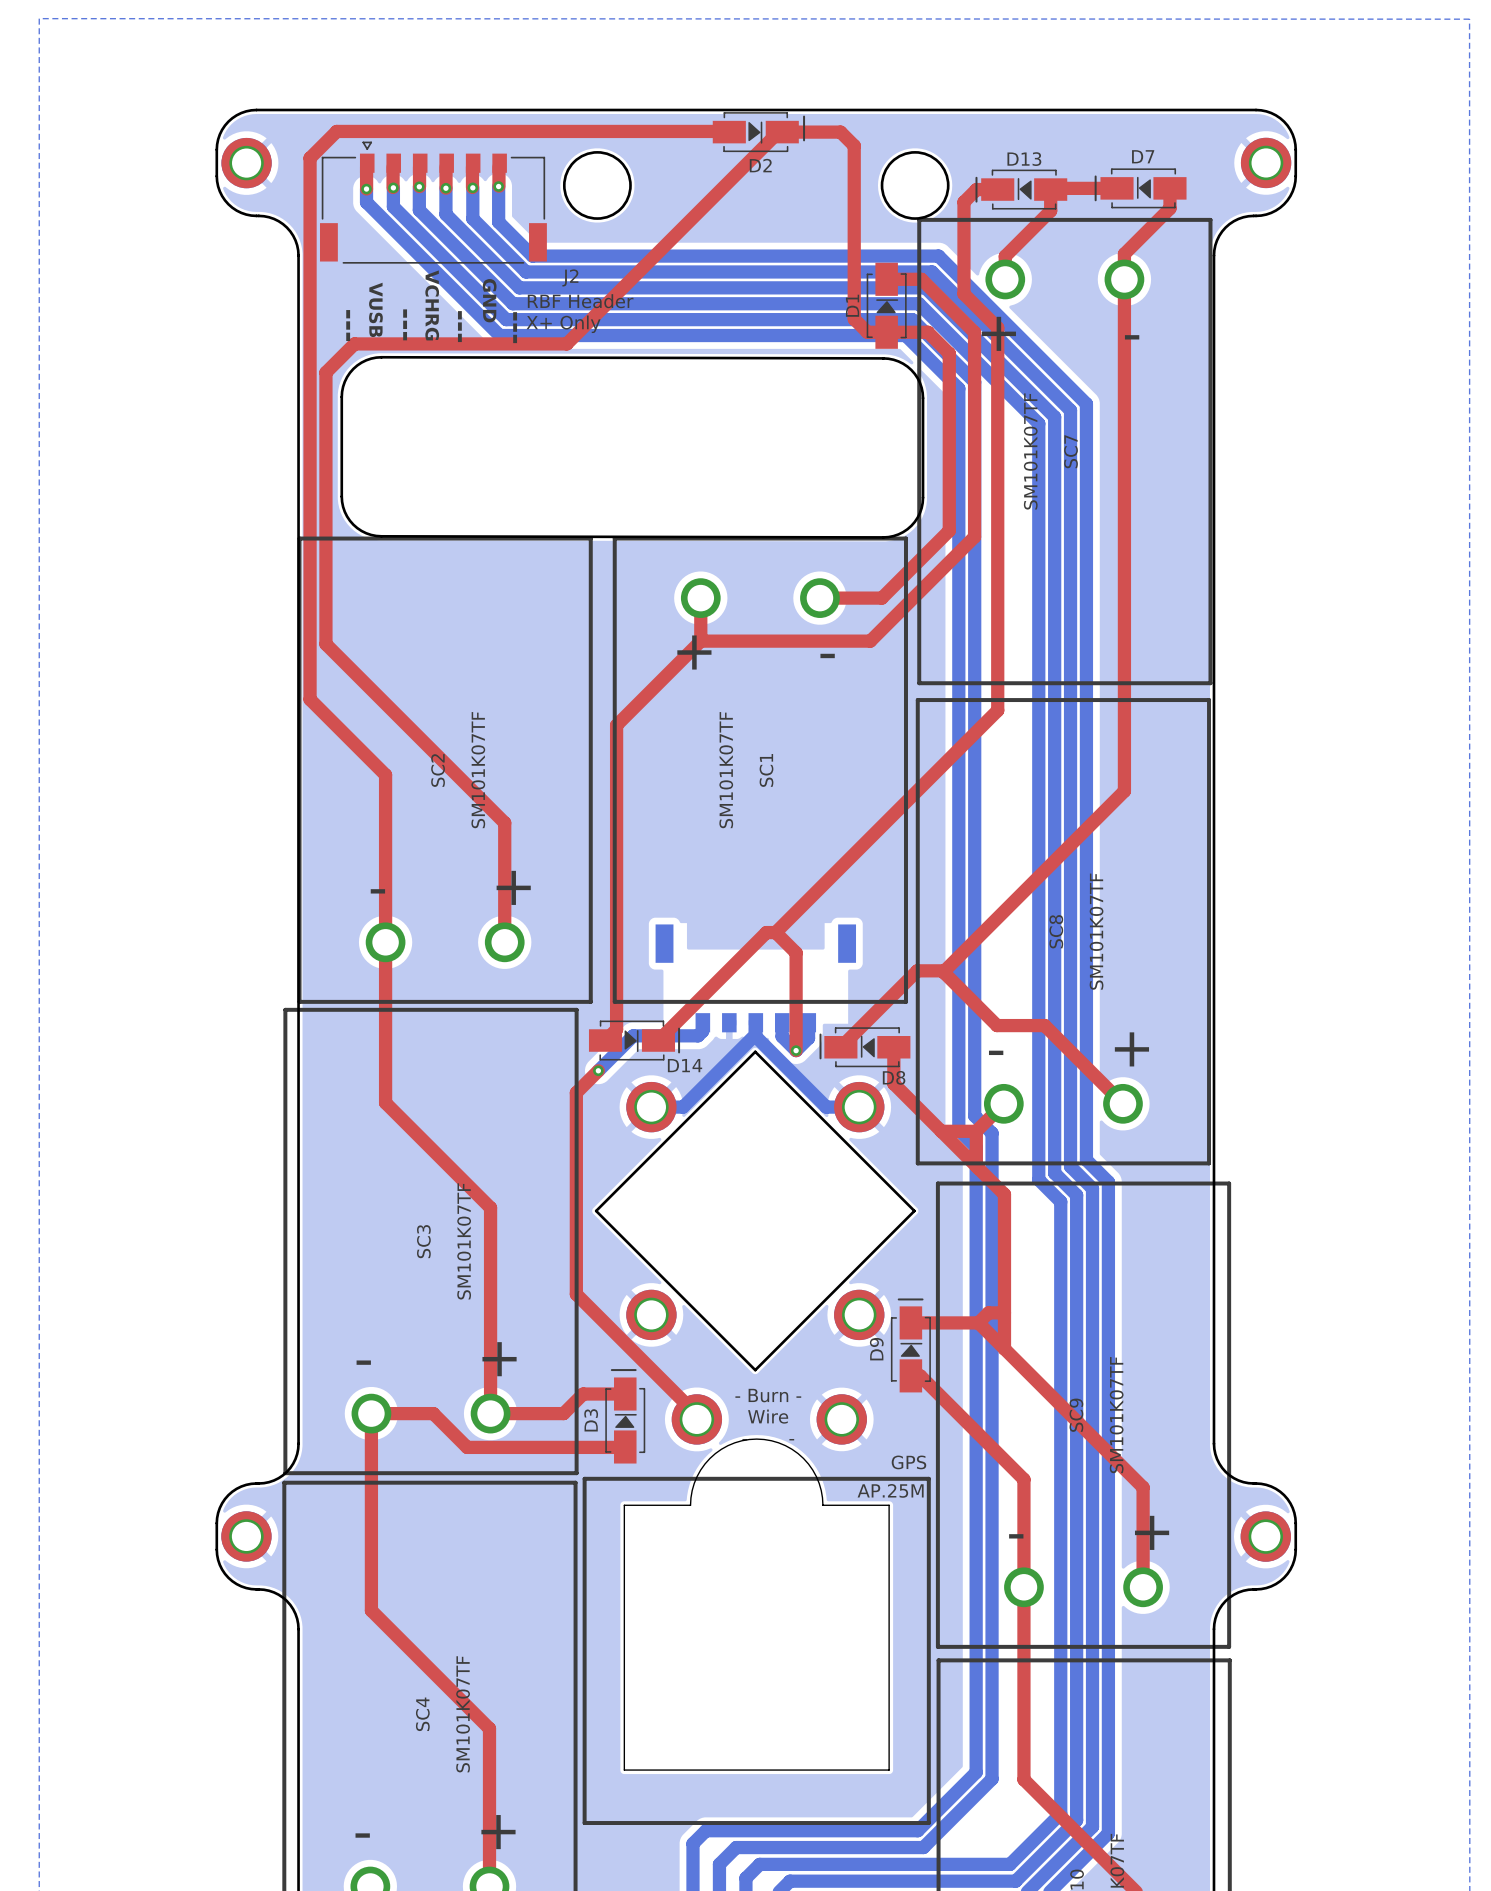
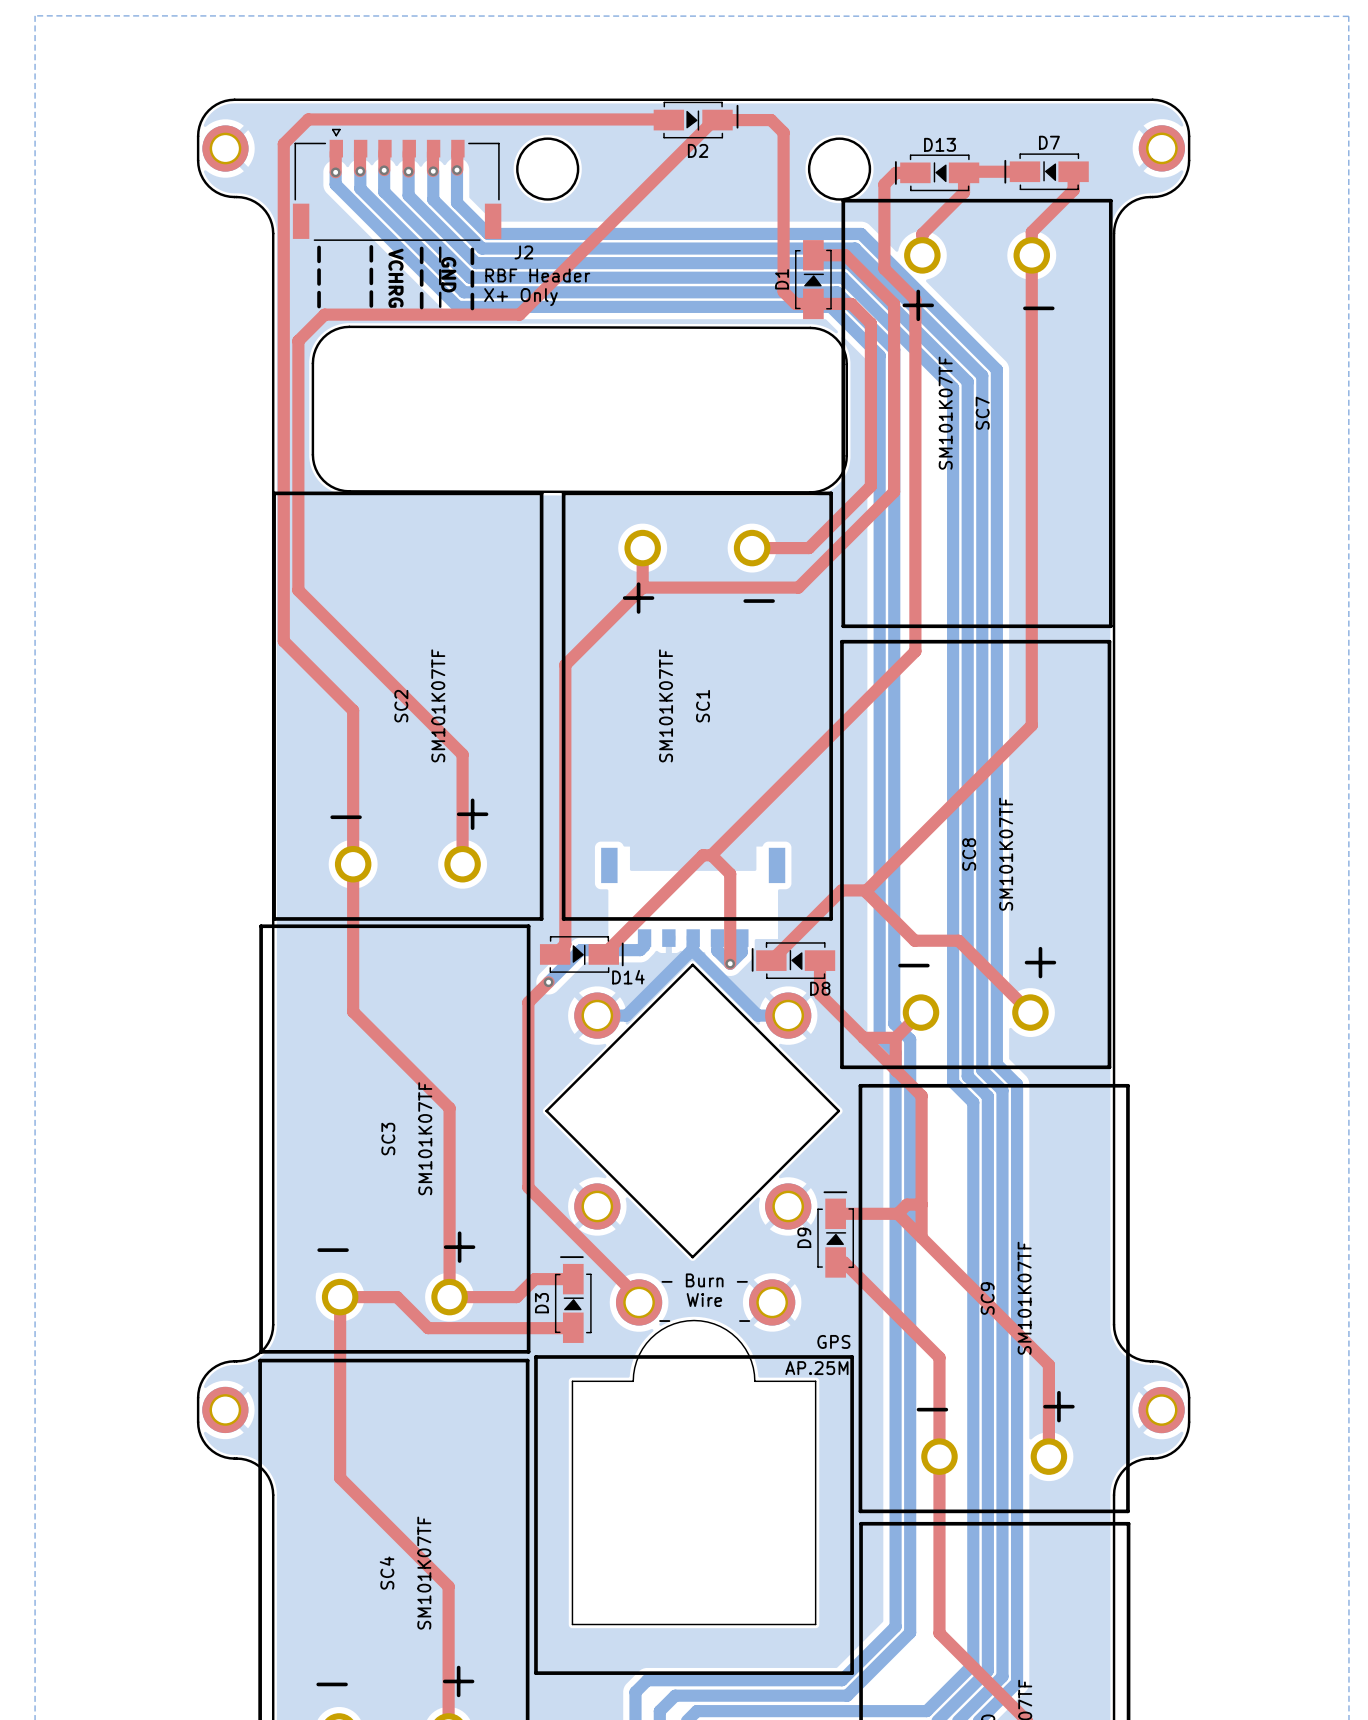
text: VUSB (375, 309) -> none
text: none -> --- (440, 277)

